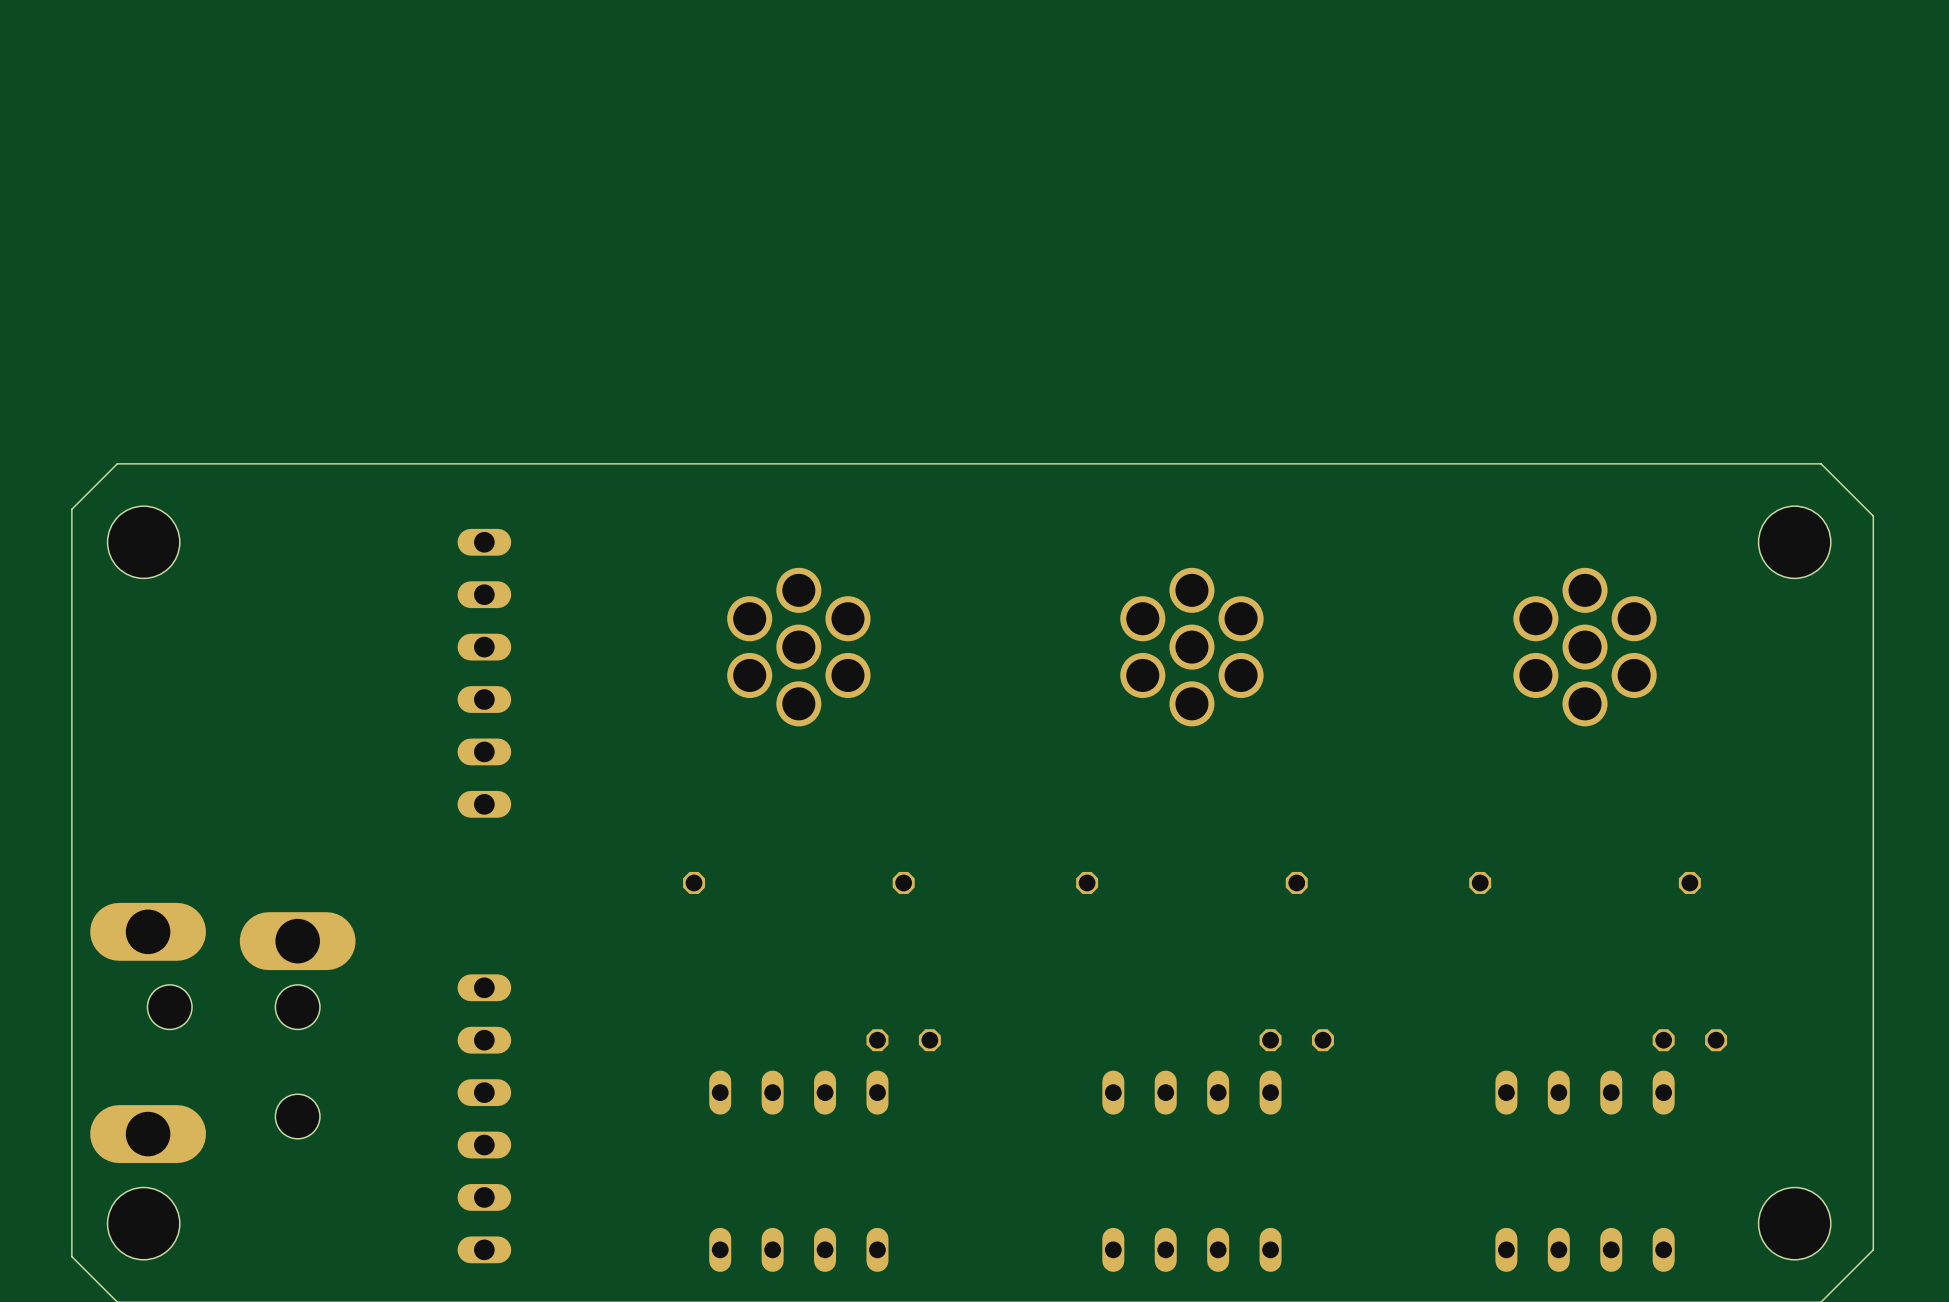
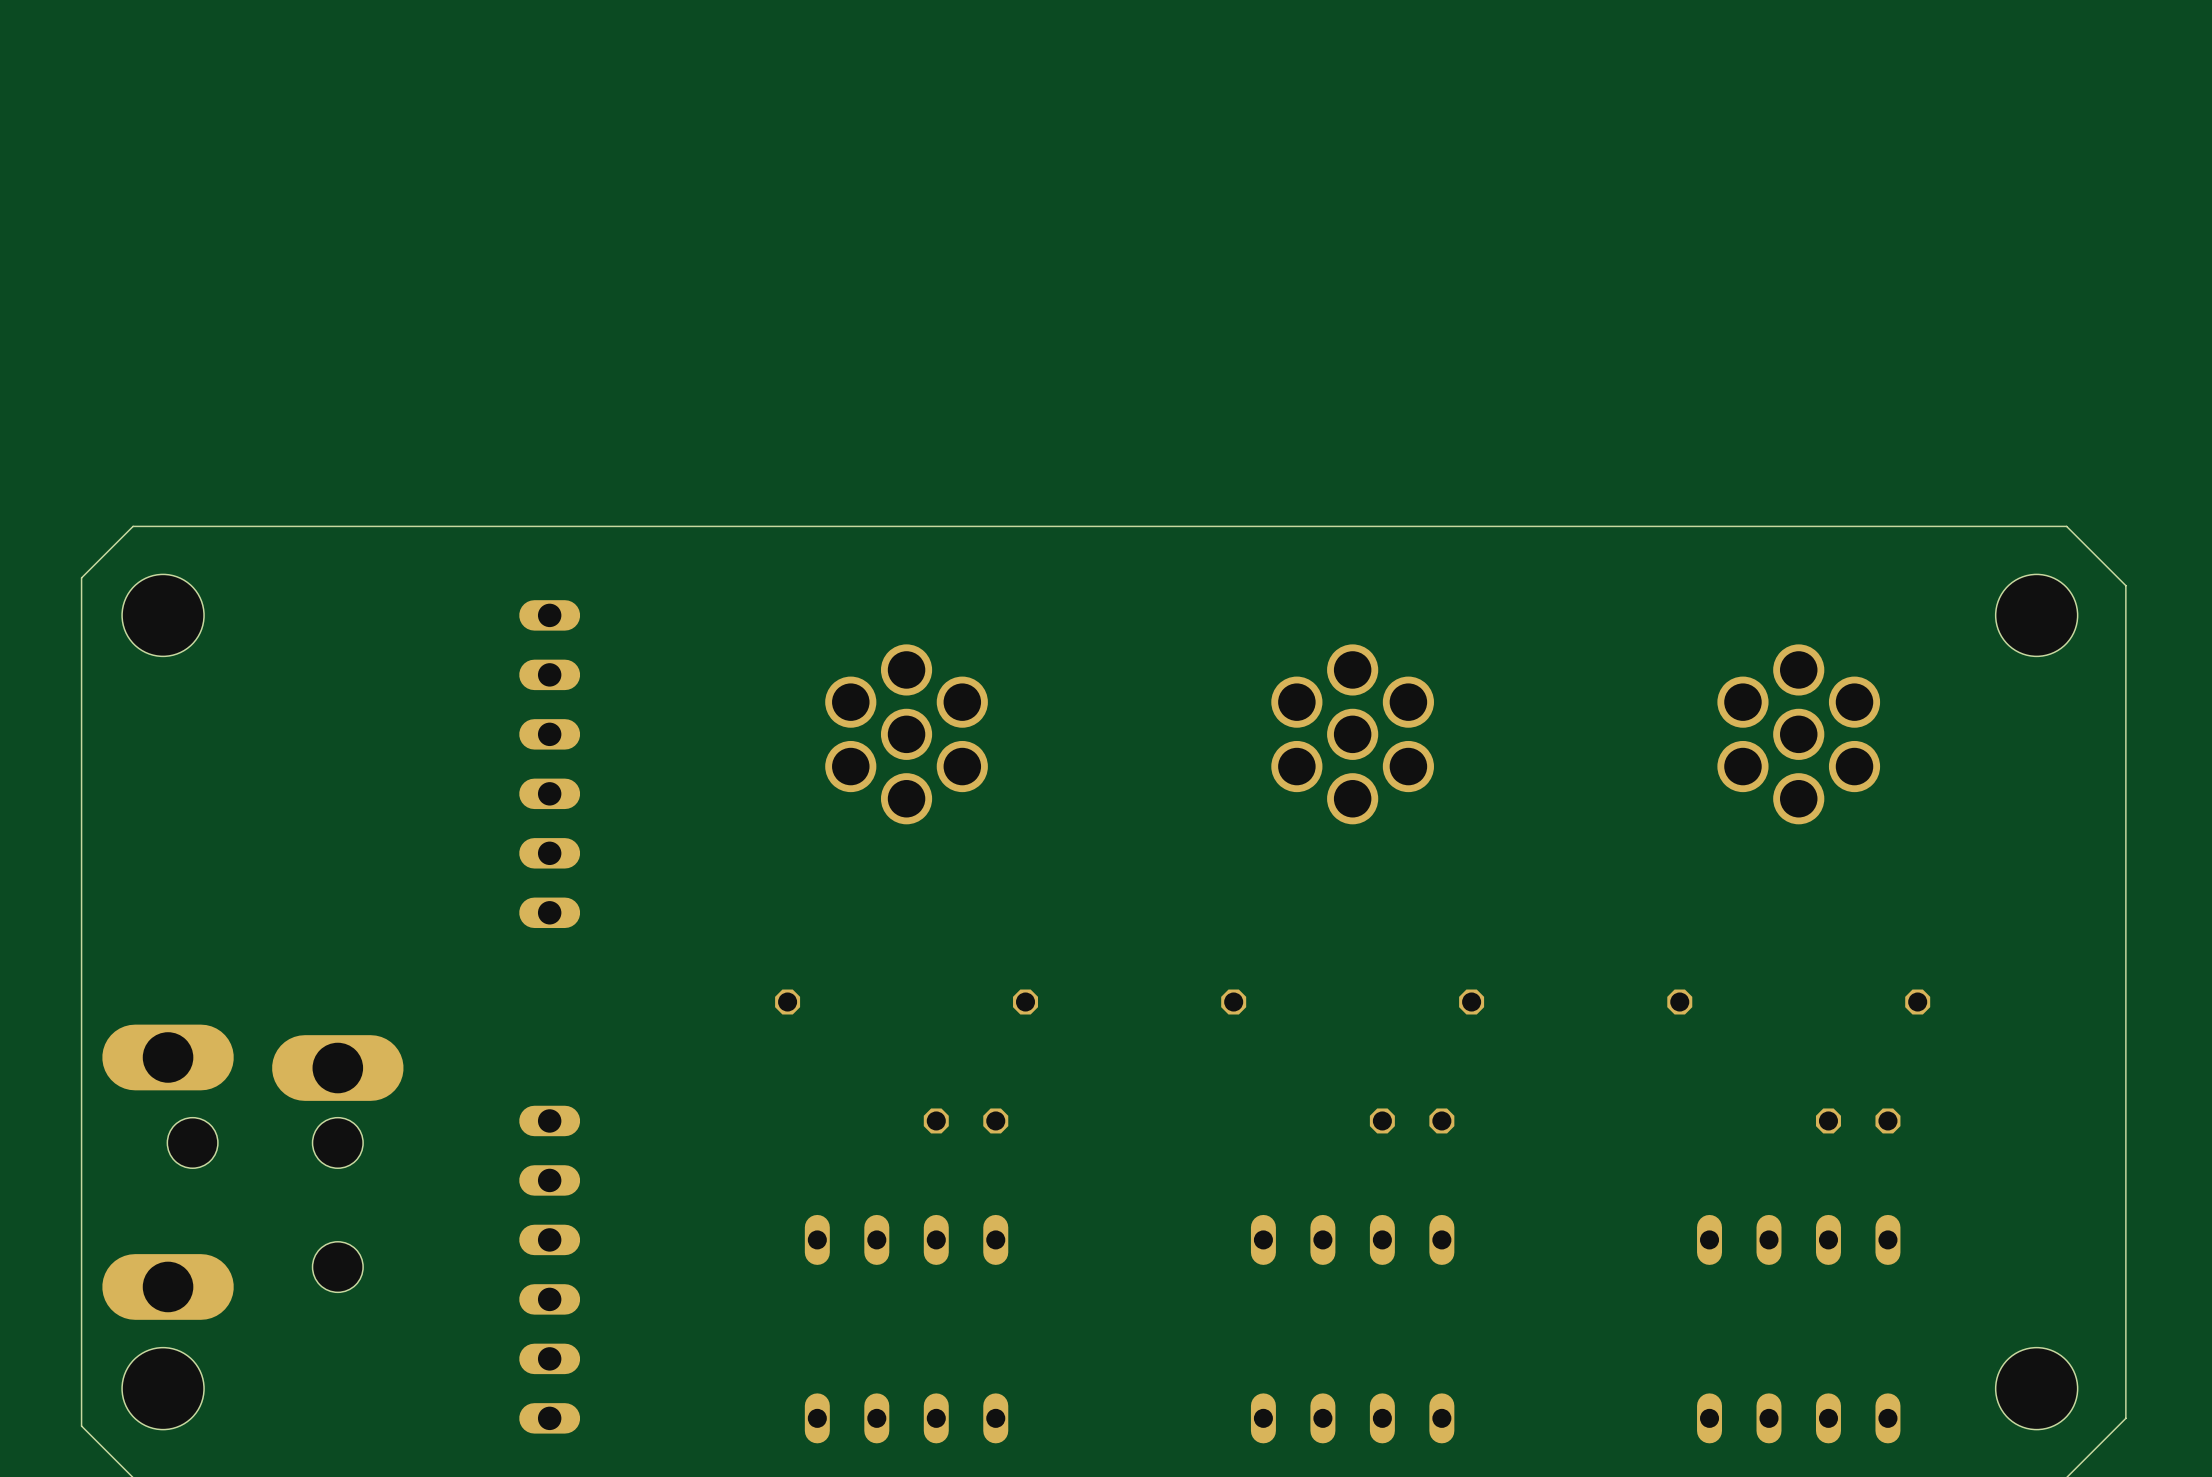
part position: (903, 1040) -> (966, 1120)
part position: (1296, 1040) -> (1412, 1120)
part position: (1689, 1040) -> (1858, 1120)

